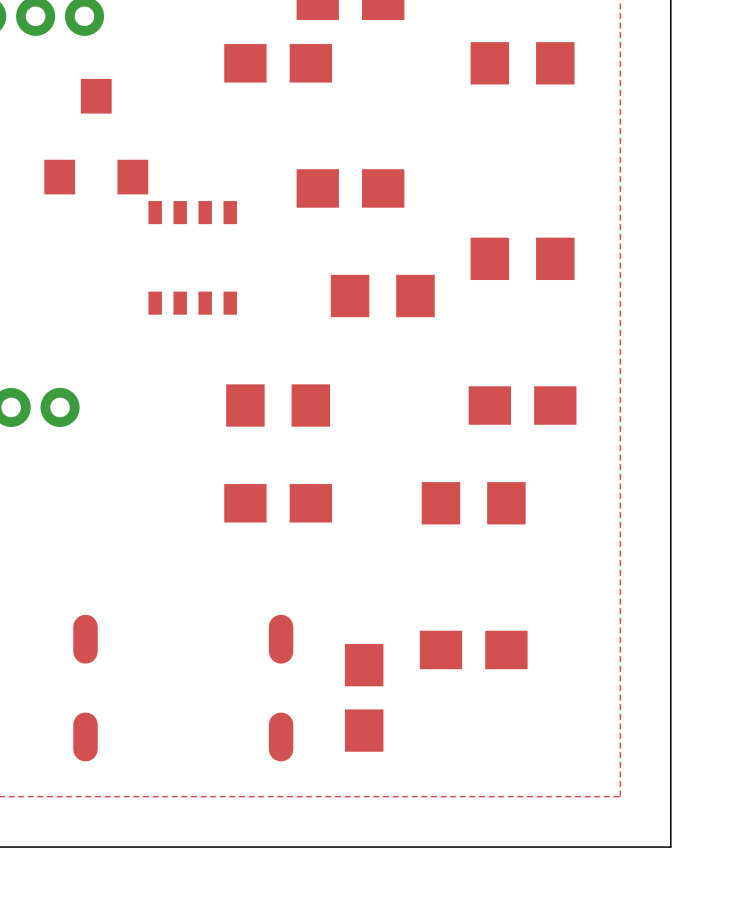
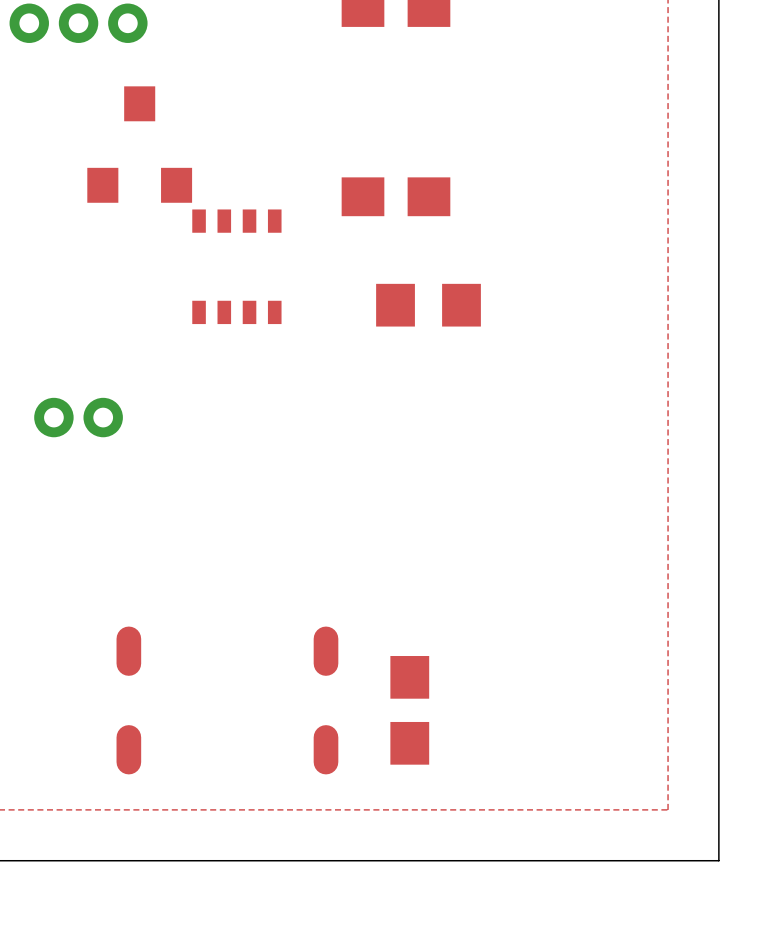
part: (278, 63) -> none
part: (522, 63) -> none
part: (522, 258) -> none
part: (278, 405) -> none
part: (522, 405) -> none
part: (278, 503) -> none
part: (473, 503) -> none
part: (473, 649) -> none

